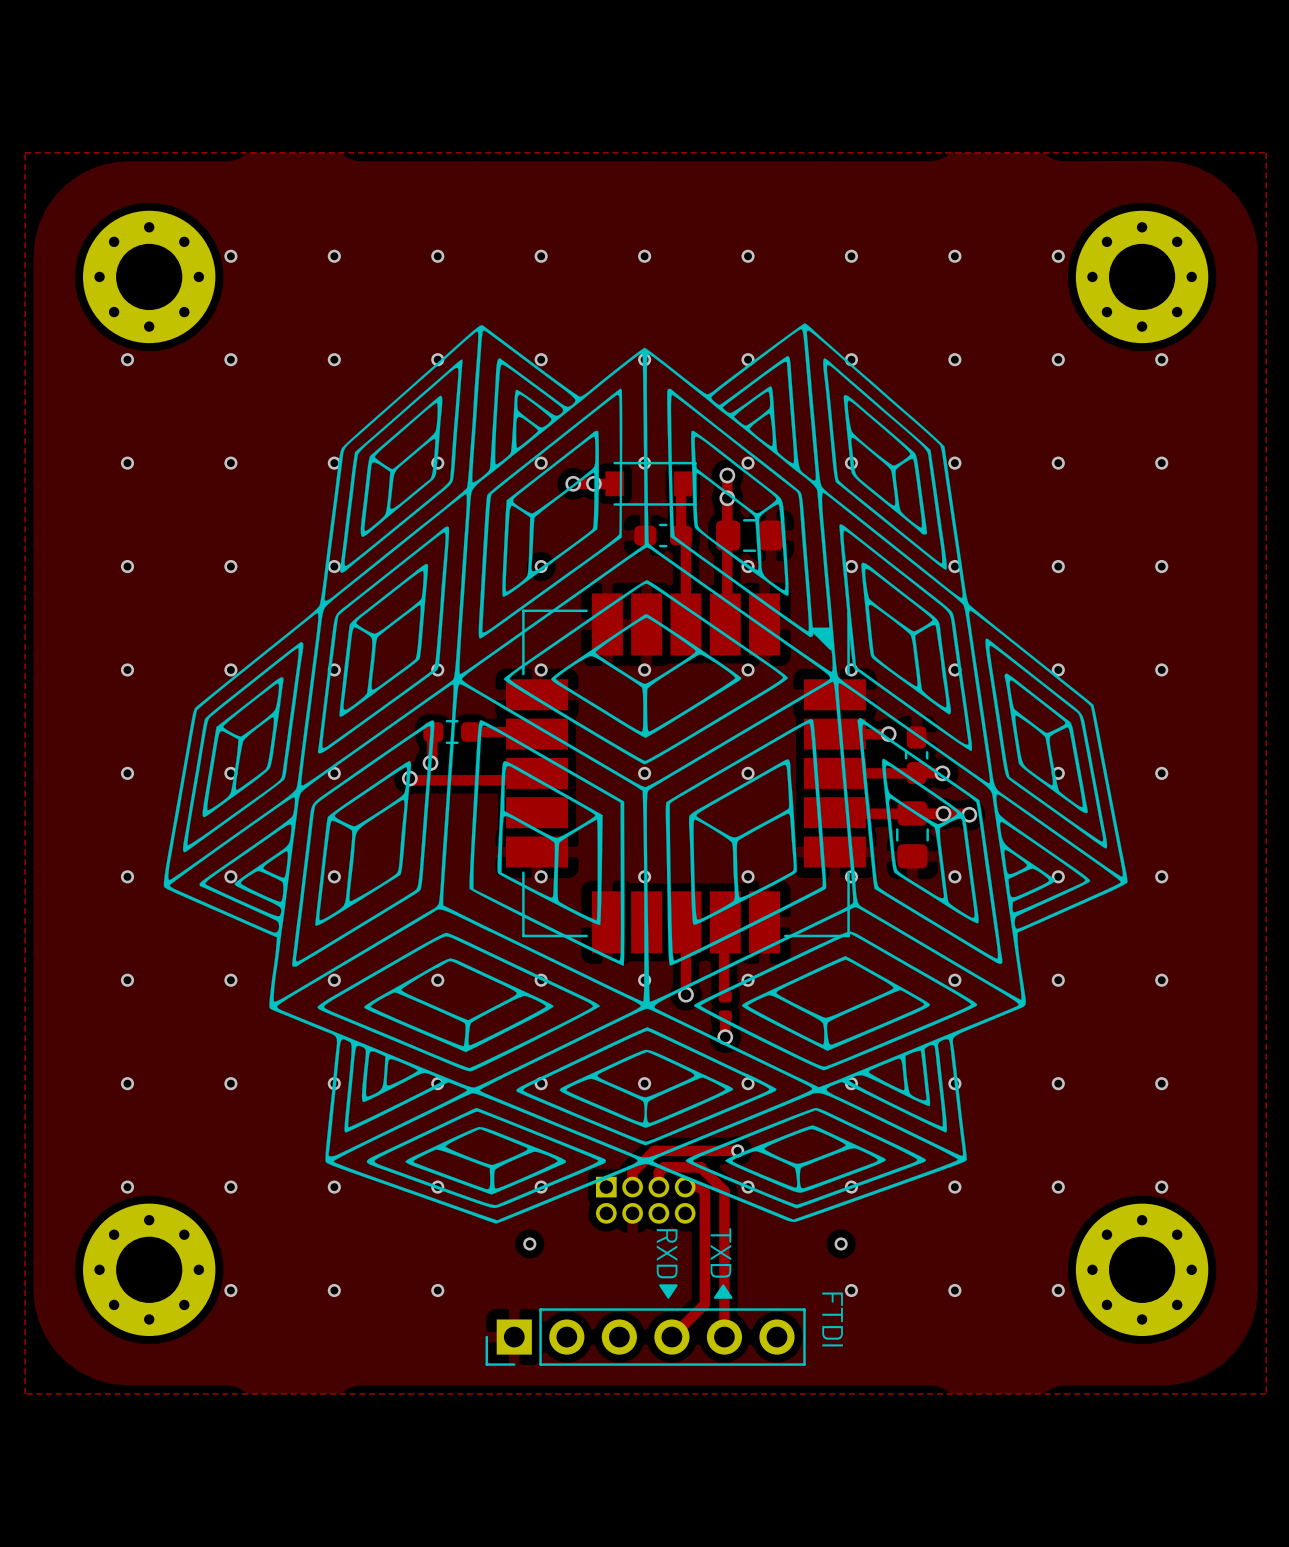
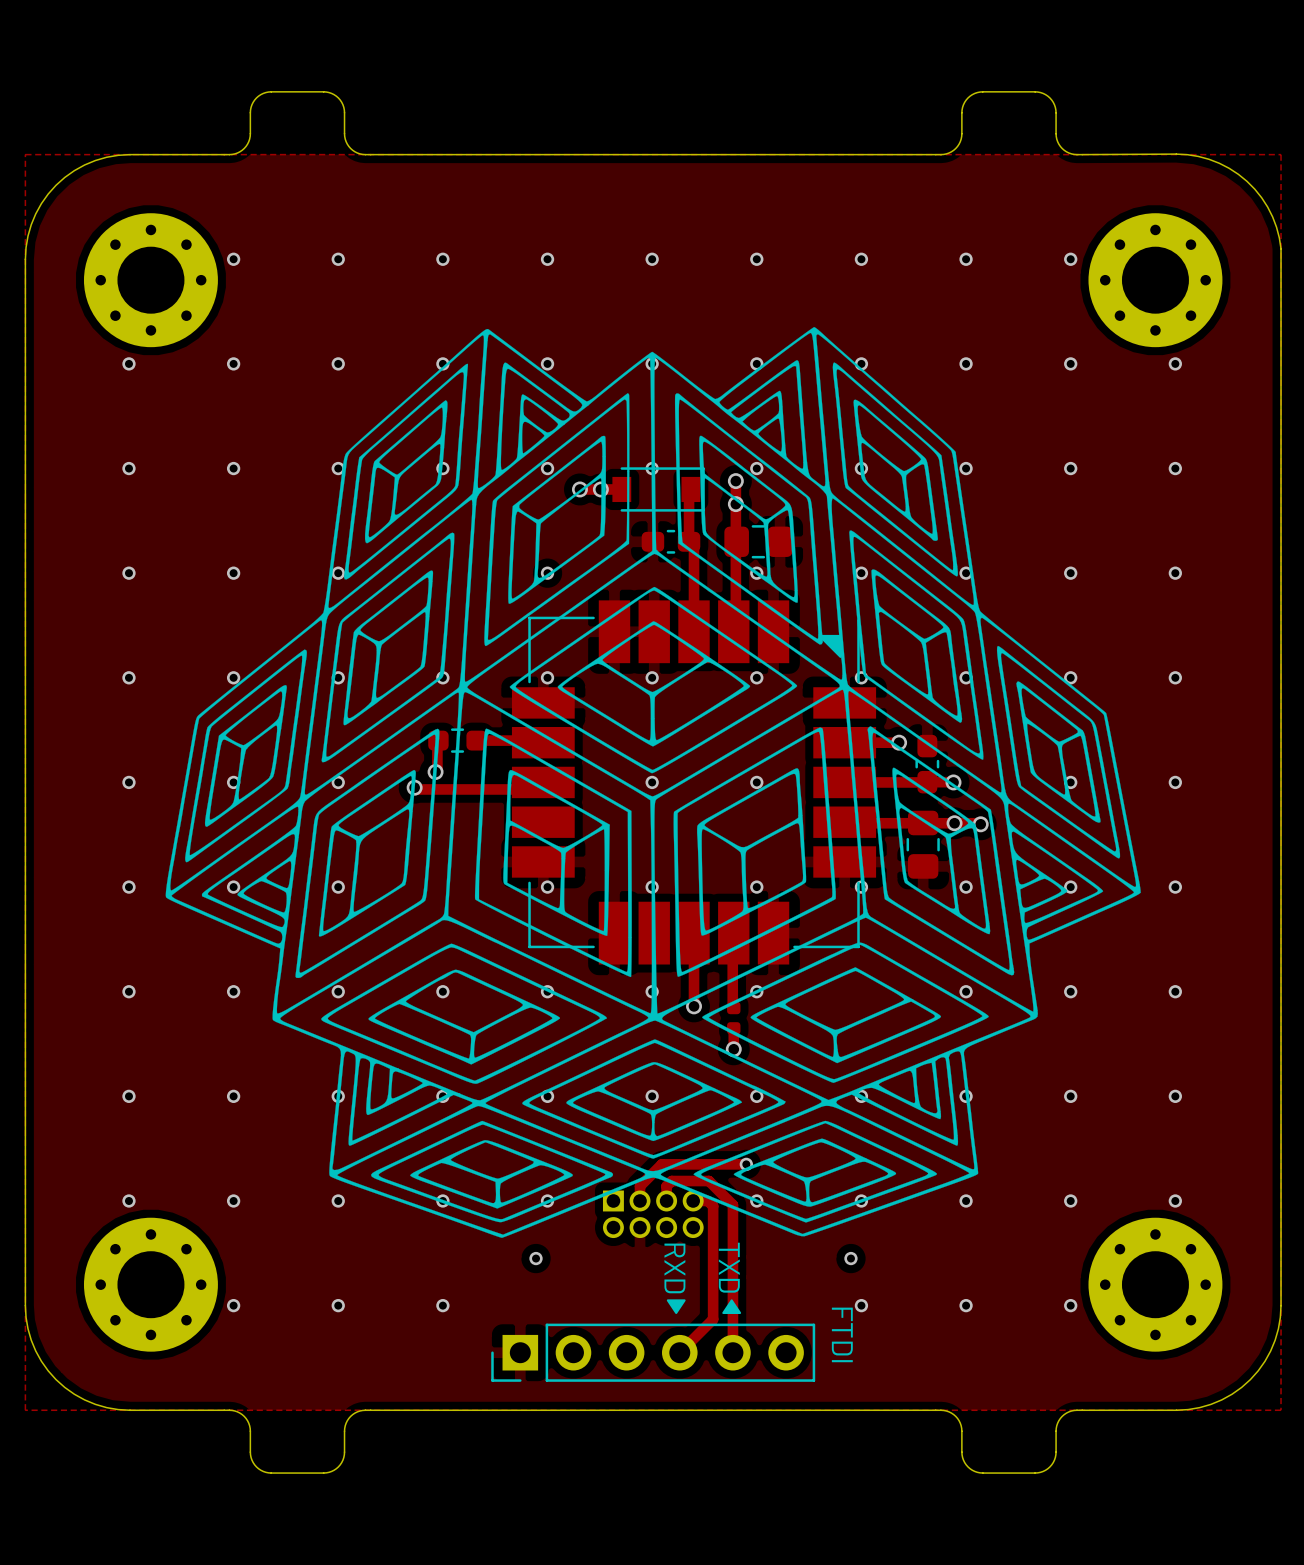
board edge: none -> (271, 91) (323, 91) (334, 94) (340, 100) (343, 107) (344, 136) (347, 144) (354, 151) (365, 154) (943, 154) (953, 150) (960, 141) (962, 107) (966, 100) (972, 94) (982, 91) (1037, 92) (1047, 96) (1053, 102) (1055, 110) (1056, 139) (1062, 148) (1068, 153) (1076, 154) (1176, 154) (1198, 156) (1229, 168) (1246, 181) (1261, 197) (1276, 227) (1281, 248) (1281, 1305) (1278, 1328) (1270, 1351) (1258, 1370) (1241, 1387) (1210, 1404) (1188, 1409) (1068, 1411) (1062, 1416) (1056, 1425) (1055, 1454) (1053, 1462) (1047, 1468) (1037, 1472) (982, 1473) (972, 1470) (966, 1464) (962, 1457) (960, 1423) (953, 1414) (943, 1410) (365, 1410) (354, 1413) (347, 1420) (344, 1428) (343, 1457) (340, 1464) (334, 1470) (323, 1473) (271, 1473) (260, 1470) (253, 1462) (250, 1454) (249, 1425) (244, 1416) (237, 1411) (130, 1410) (106, 1407) (74, 1394) (48, 1370) (31, 1340) (25, 1305) (25, 259) (28, 235) (35, 213) (56, 185) (74, 170) (95, 160) (118, 155) (229, 154) (239, 151) (246, 146) (249, 139) (250, 110) (253, 102) (260, 94) (271, 91)

